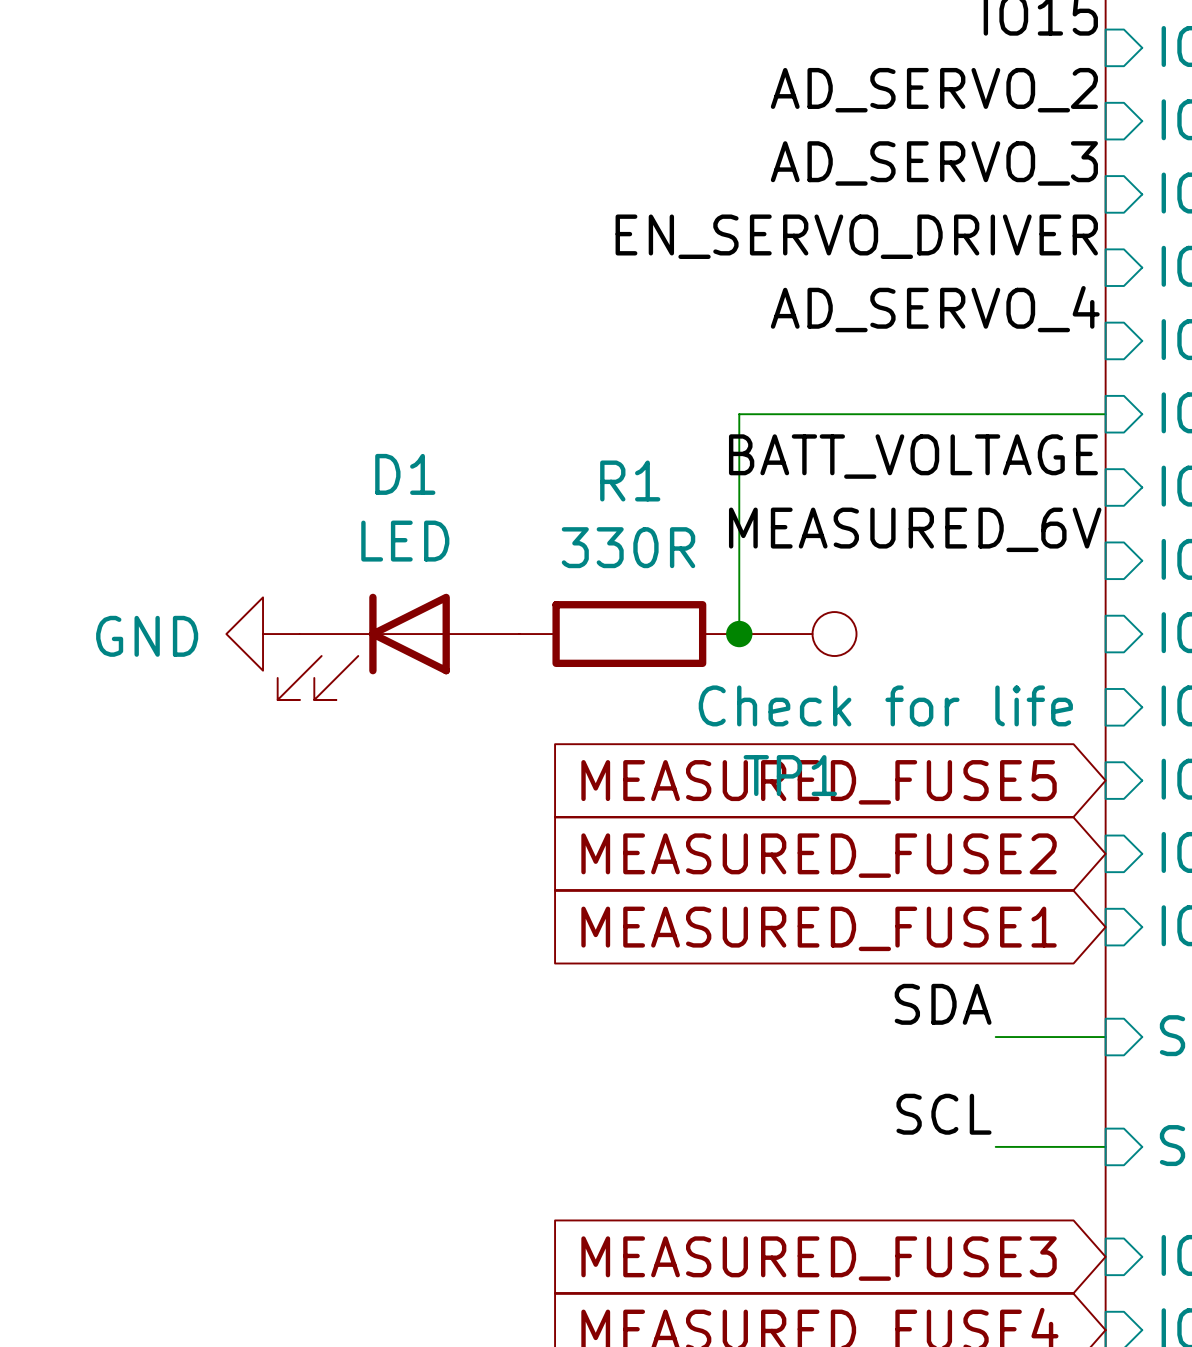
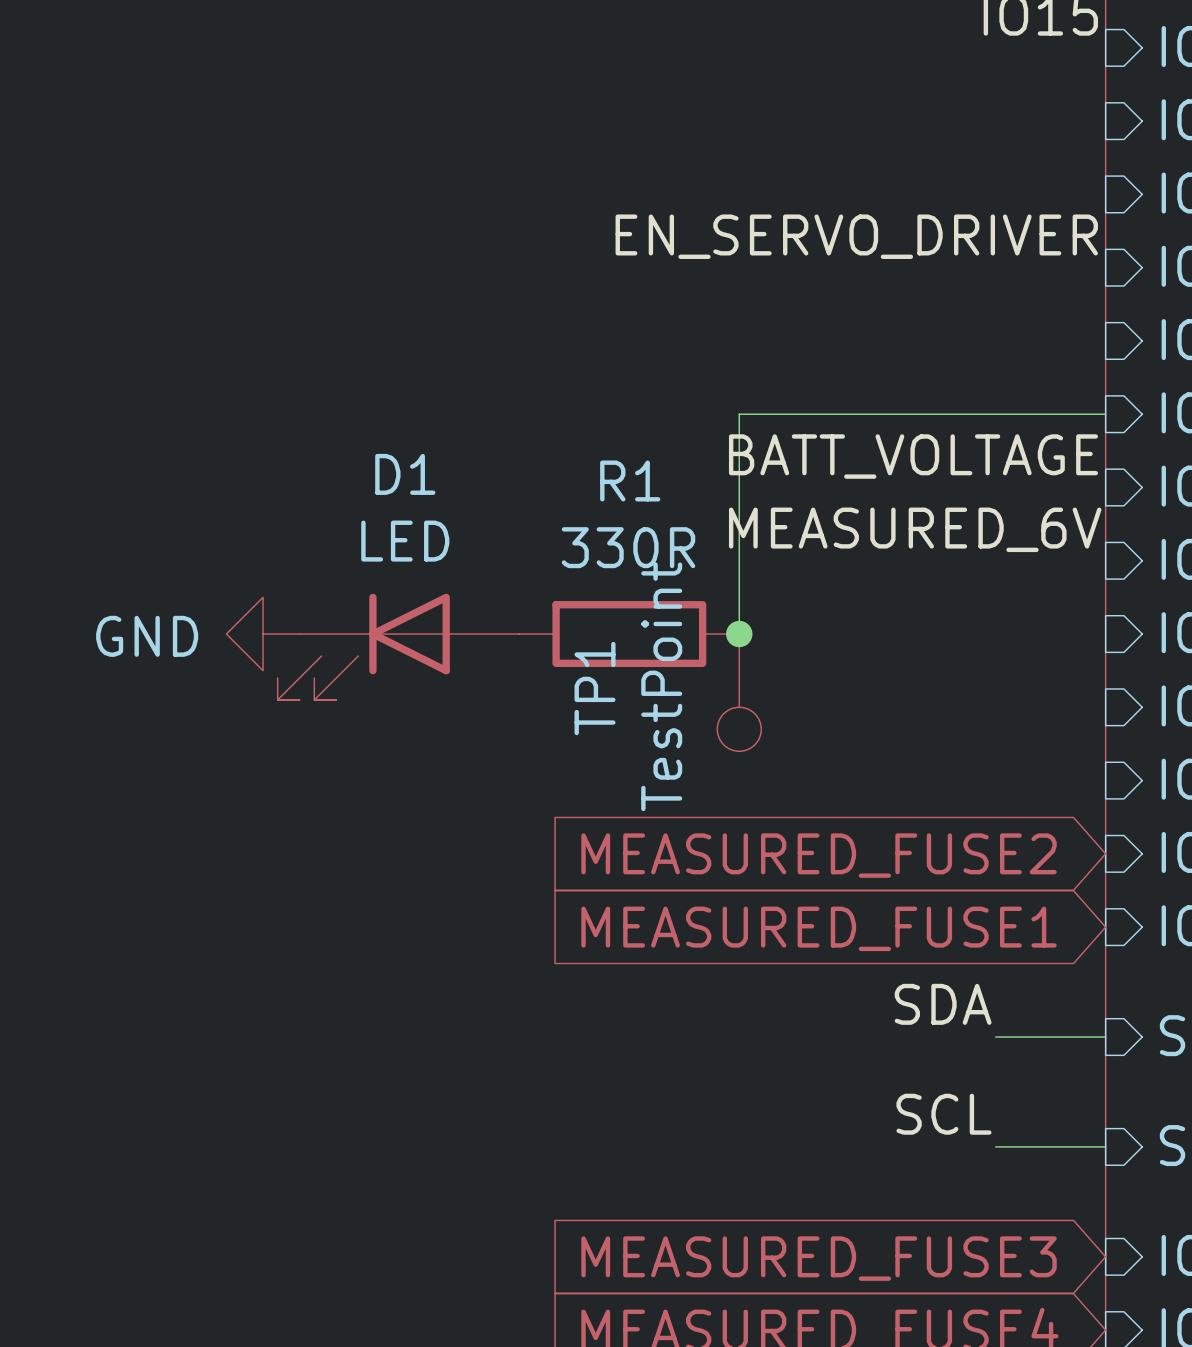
label: AD_SERVO_2 (934, 90) -> none
label: AD_SERVO_3 (934, 163) -> none
label: AD_SERVO_4 (935, 309) -> none
TP1 position: (797, 634) -> (739, 692)
TP1 rotation: 0° (834, 634) -> 90° clockwise (739, 729)
TP1 value: Check for life (885, 705) -> TestPoint (661, 686)
global label: MEASURED_FUSE5 (819, 782) -> none

